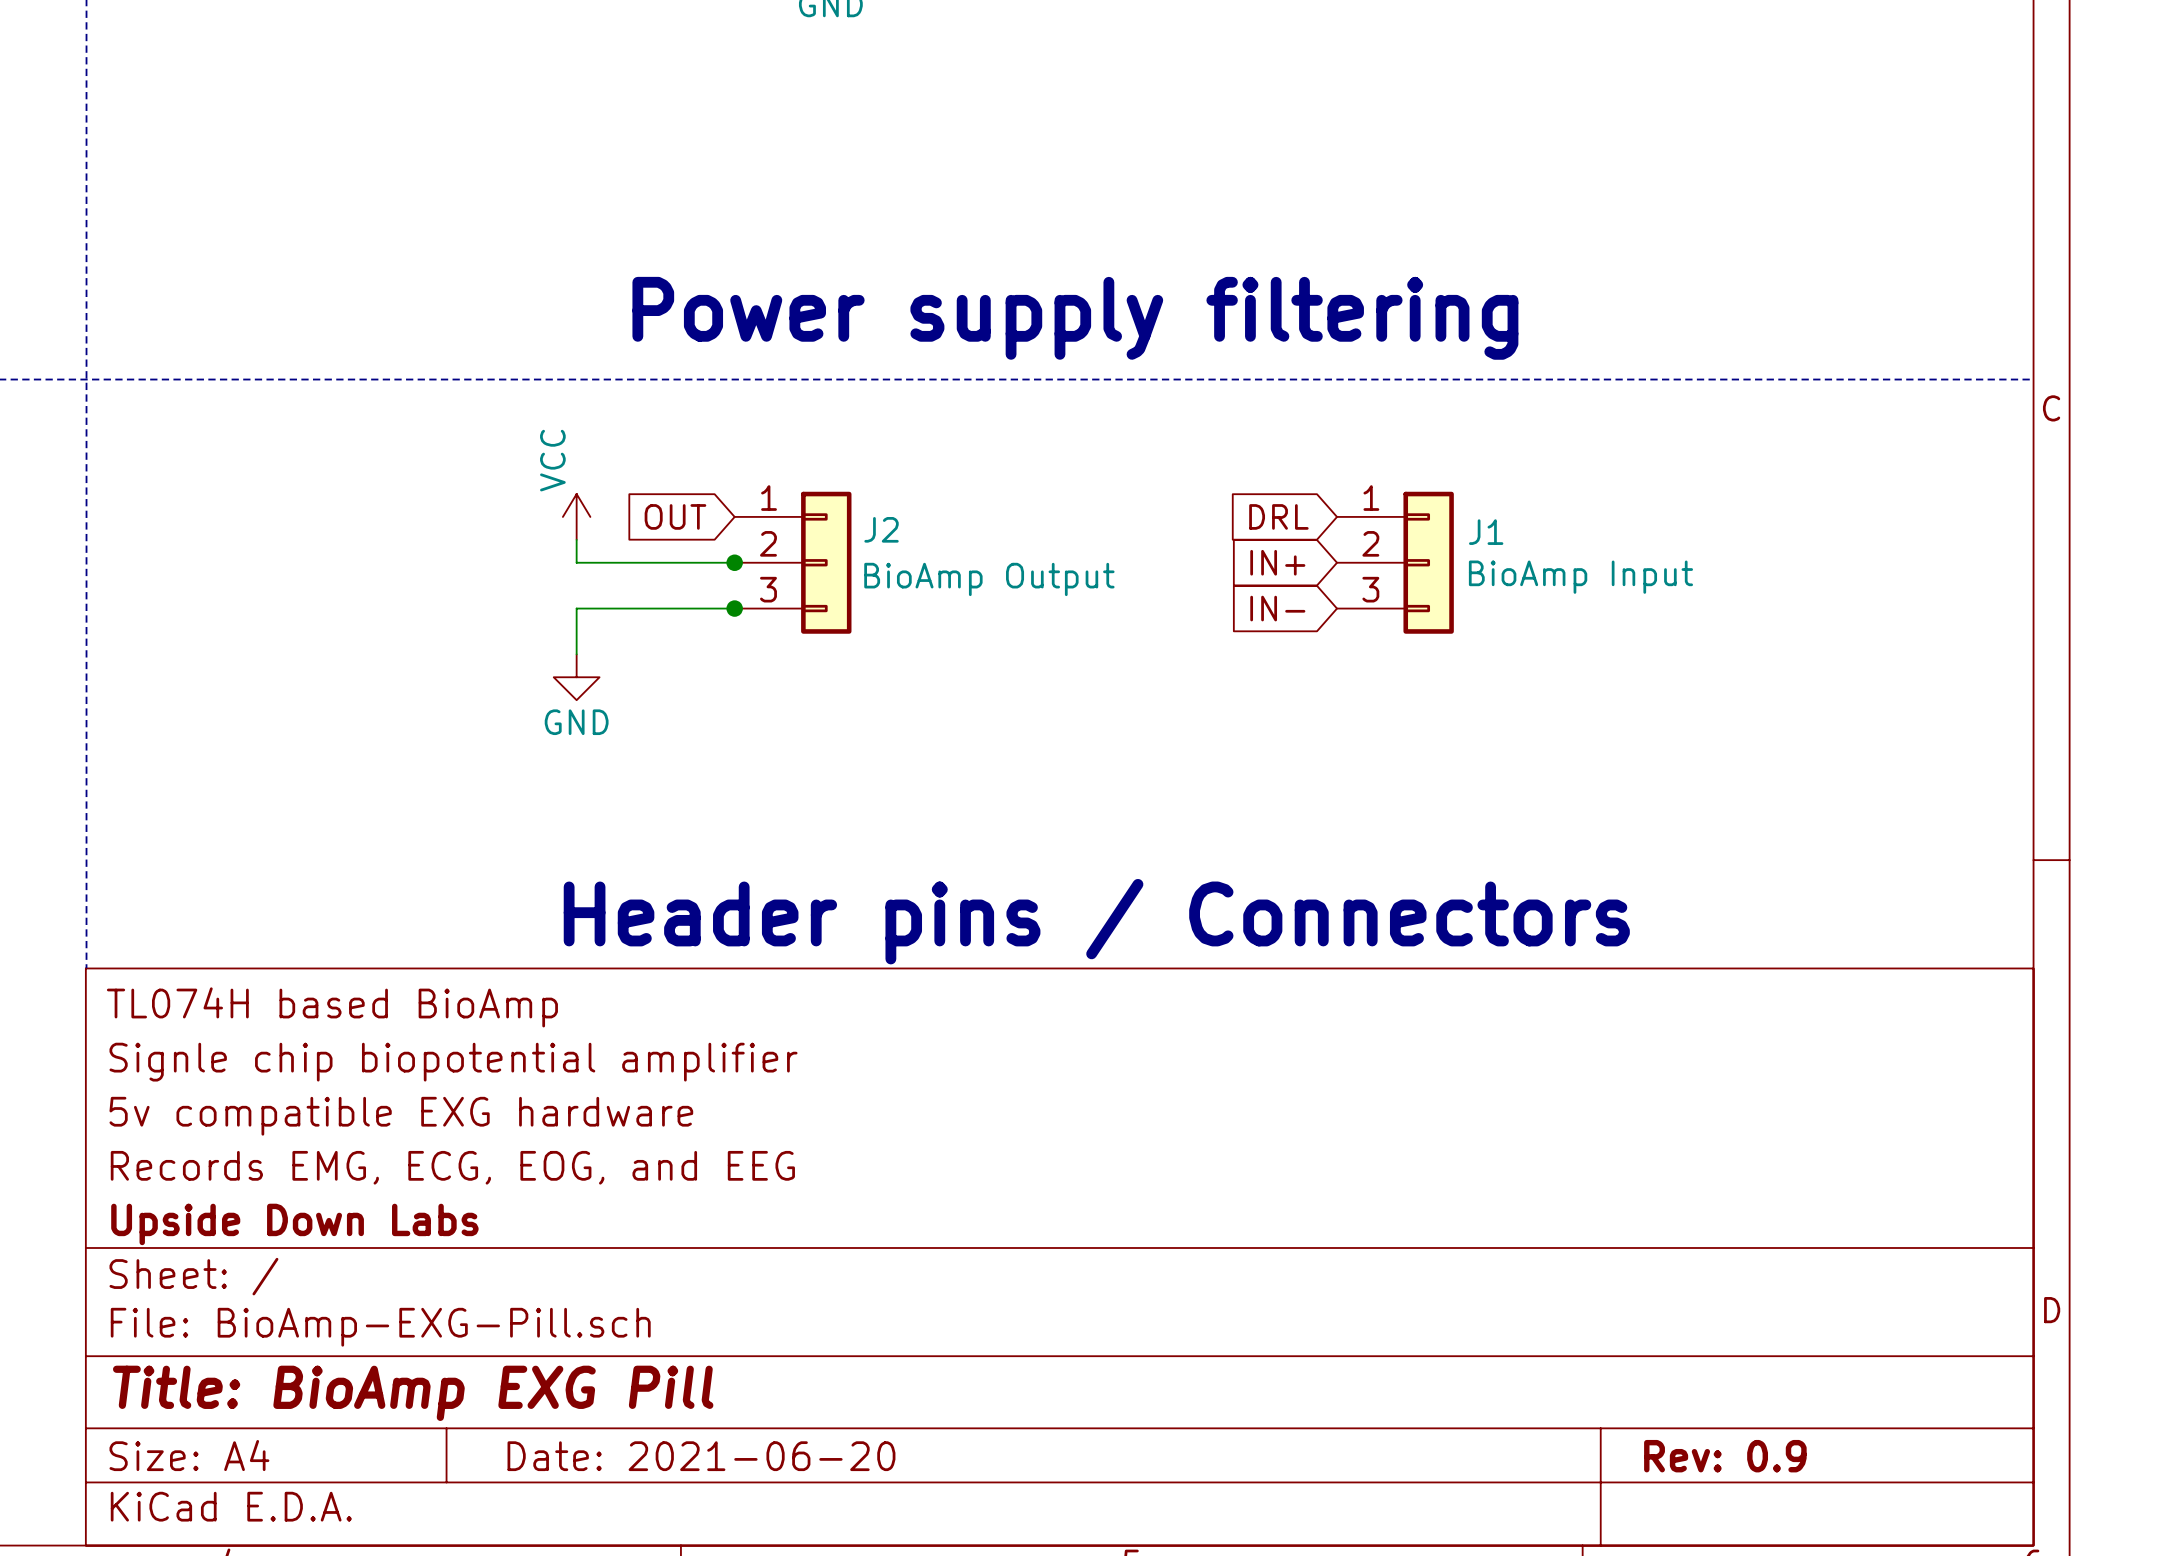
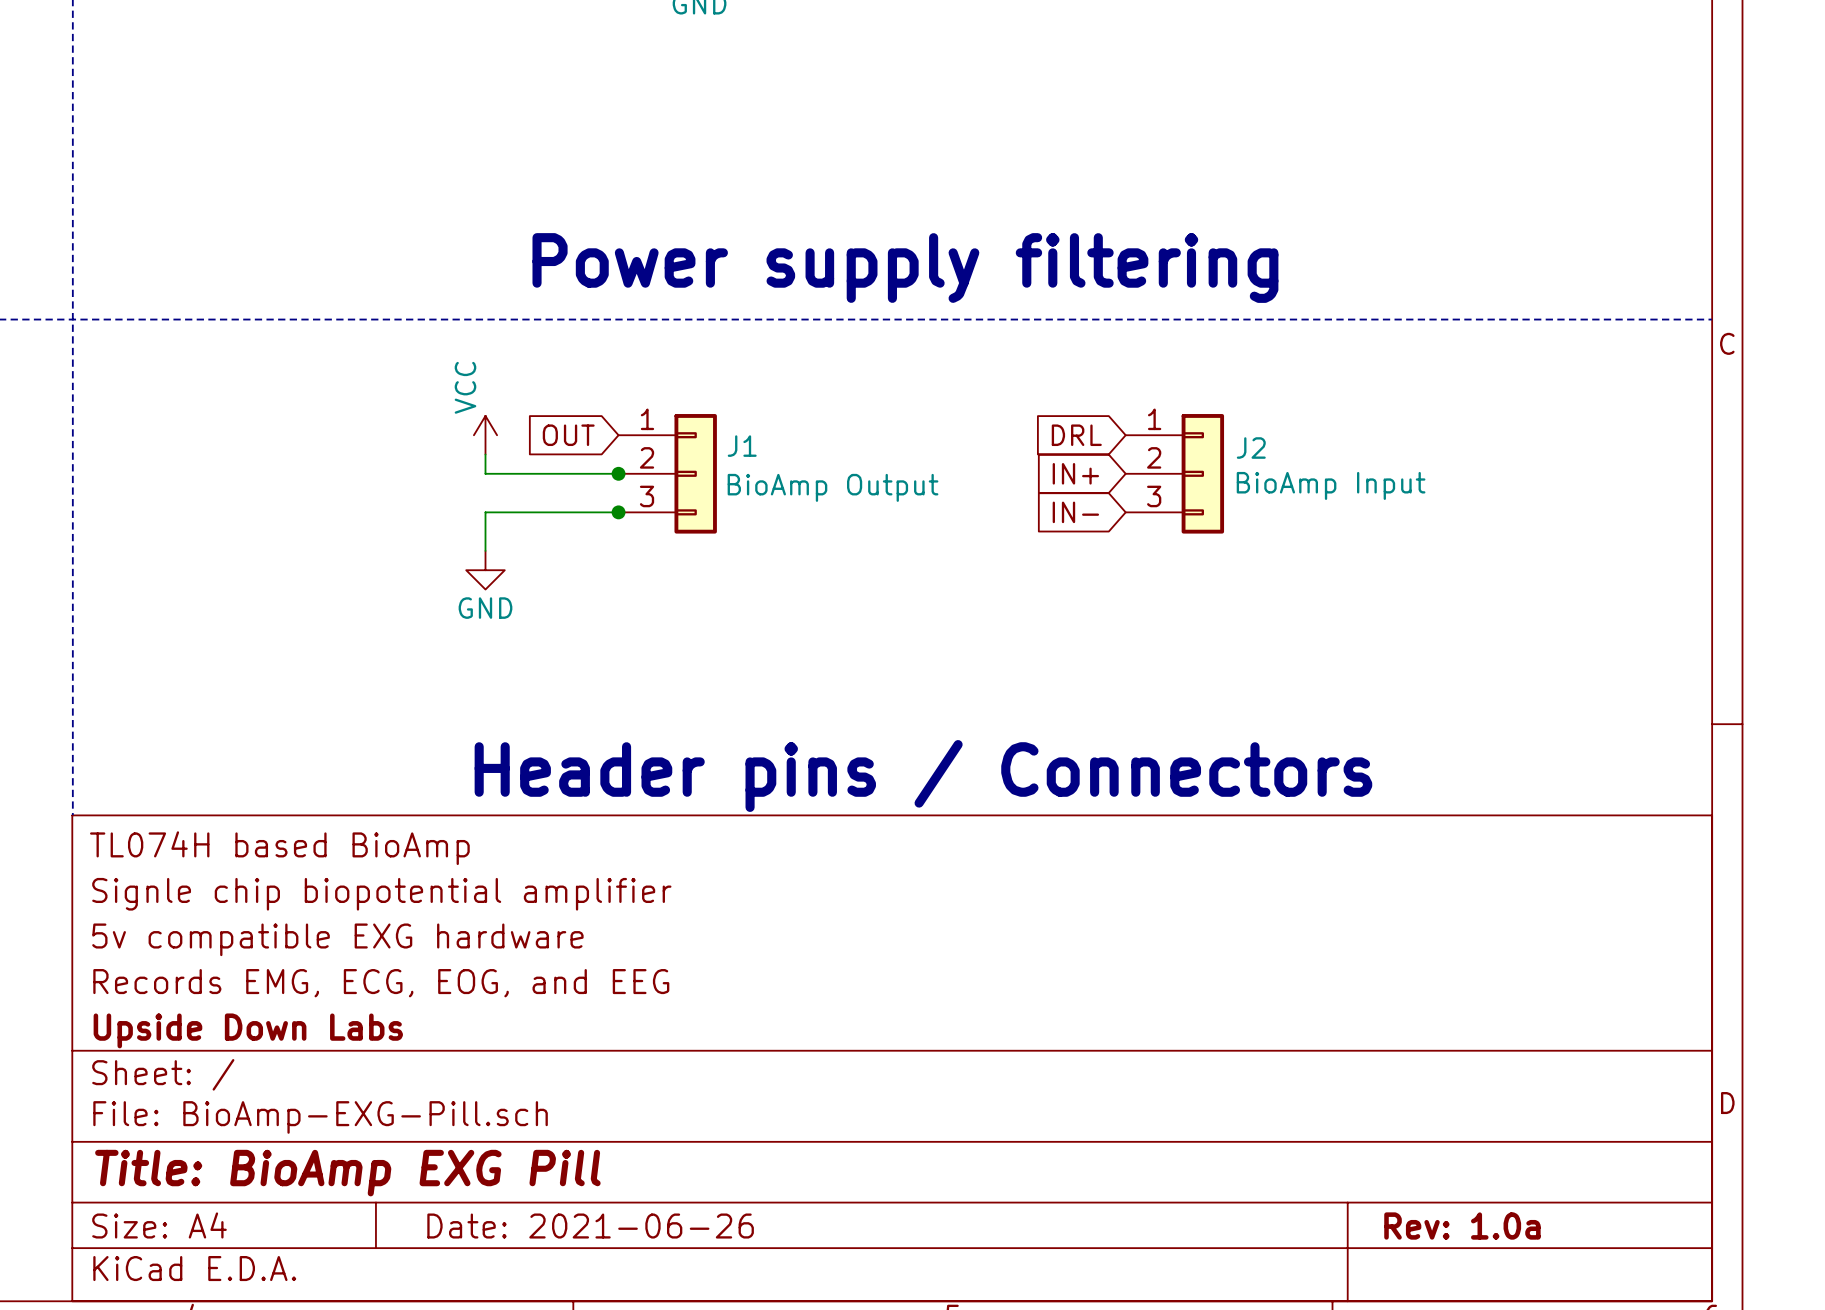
J2 name: J2 (881, 529) -> J1 (742, 446)
J1 name: J1 (1486, 532) -> J2 (1251, 448)
title block: Date: 2021-06-20 (701, 1456) -> Date: 2021-06-26 (590, 1226)
title block: Rev: 0.9 (1725, 1456) -> Rev: 1.0a (1462, 1226)

